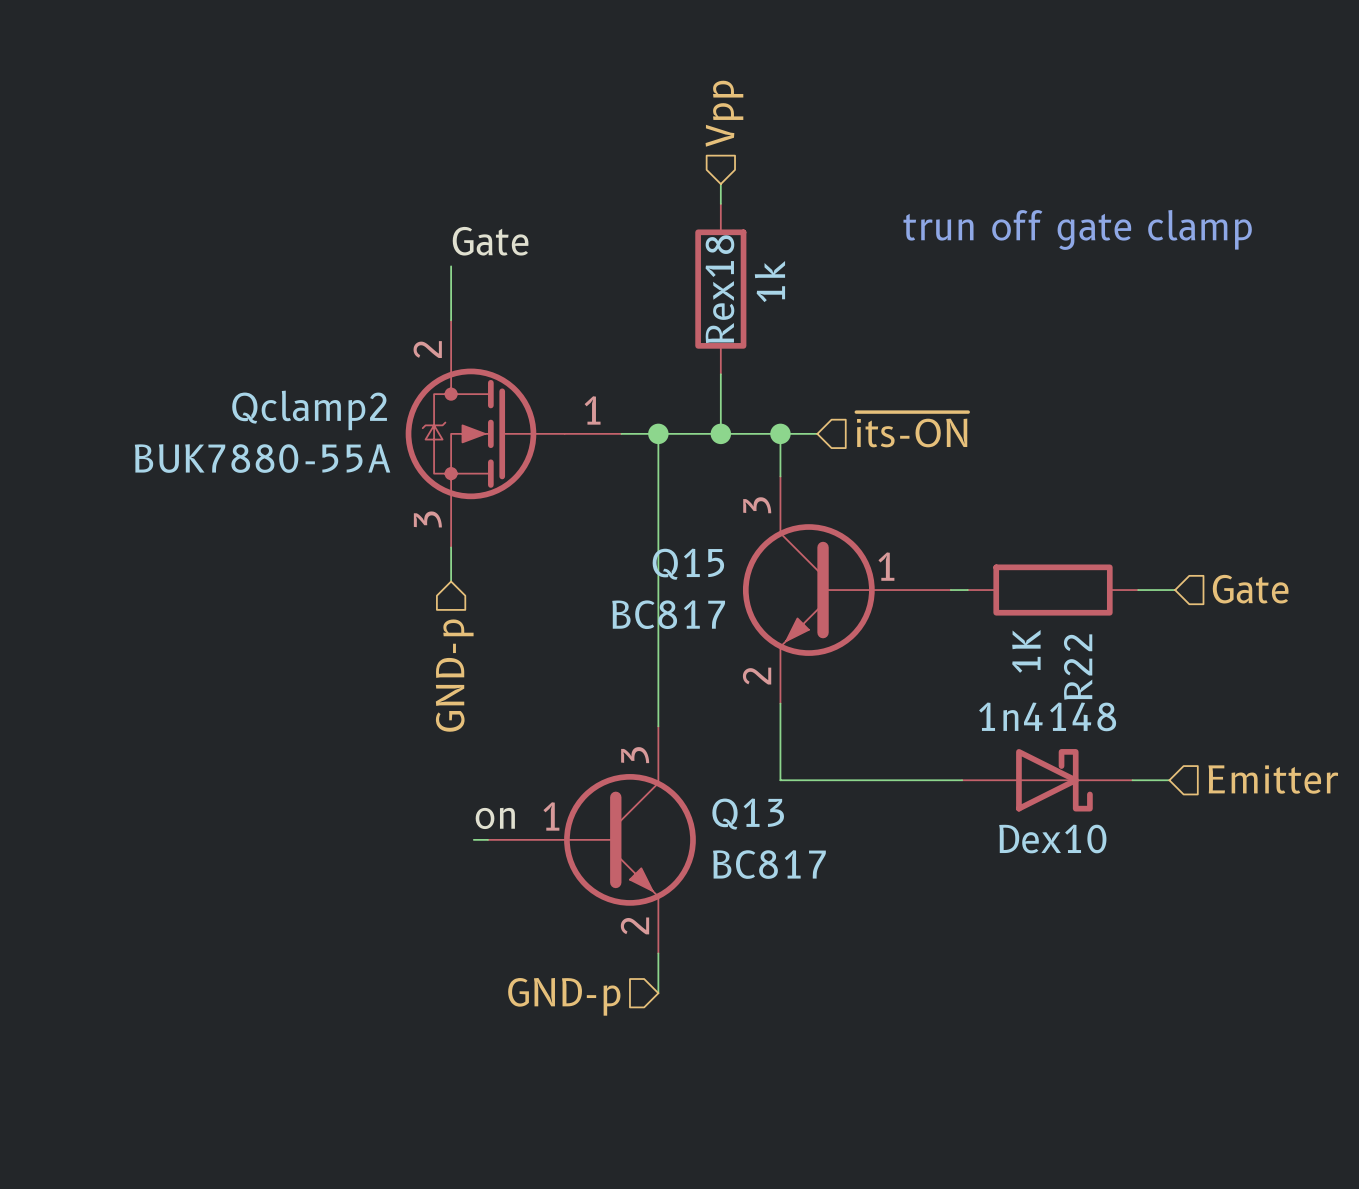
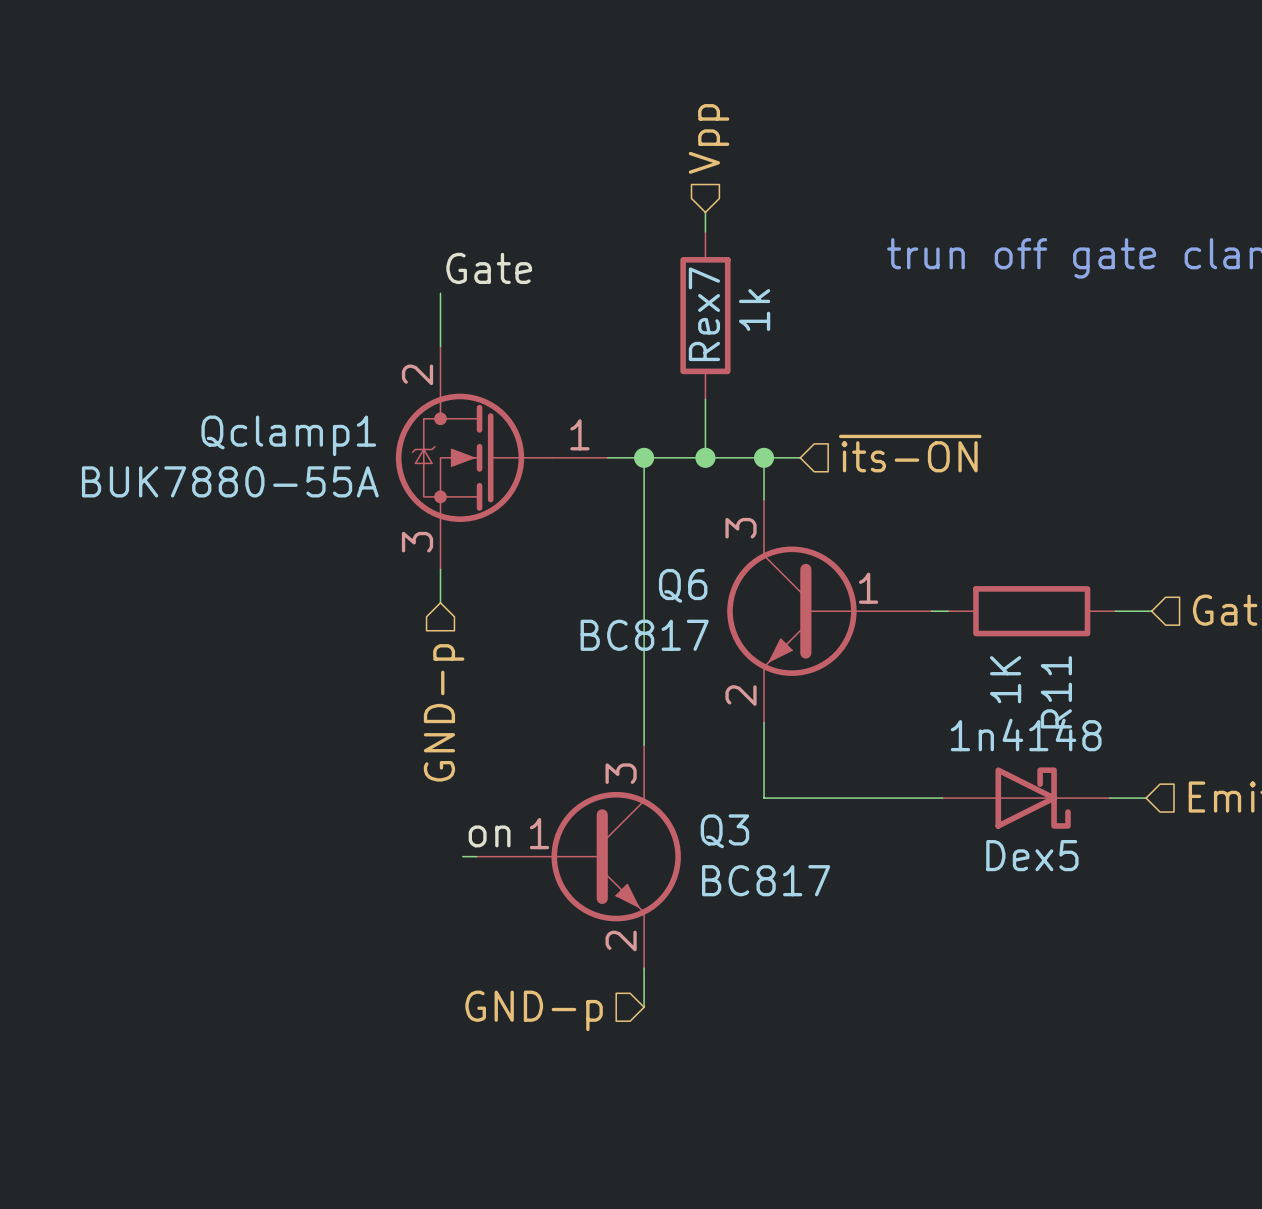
Rex18 name: Rex18 (719, 289) -> Rex7 (704, 314)
Qclamp2 name: Qclamp2 (309, 410) -> Qclamp1 (288, 435)
Q15 name: Q15 (688, 564) -> Q6 (683, 585)
R22 name: R22 (1078, 667) -> R11 (1056, 692)
Q13 name: Q13 (748, 814) -> Q3 (724, 831)
Dex10 name: Dex10 (1052, 838) -> Dex5 (1032, 855)

